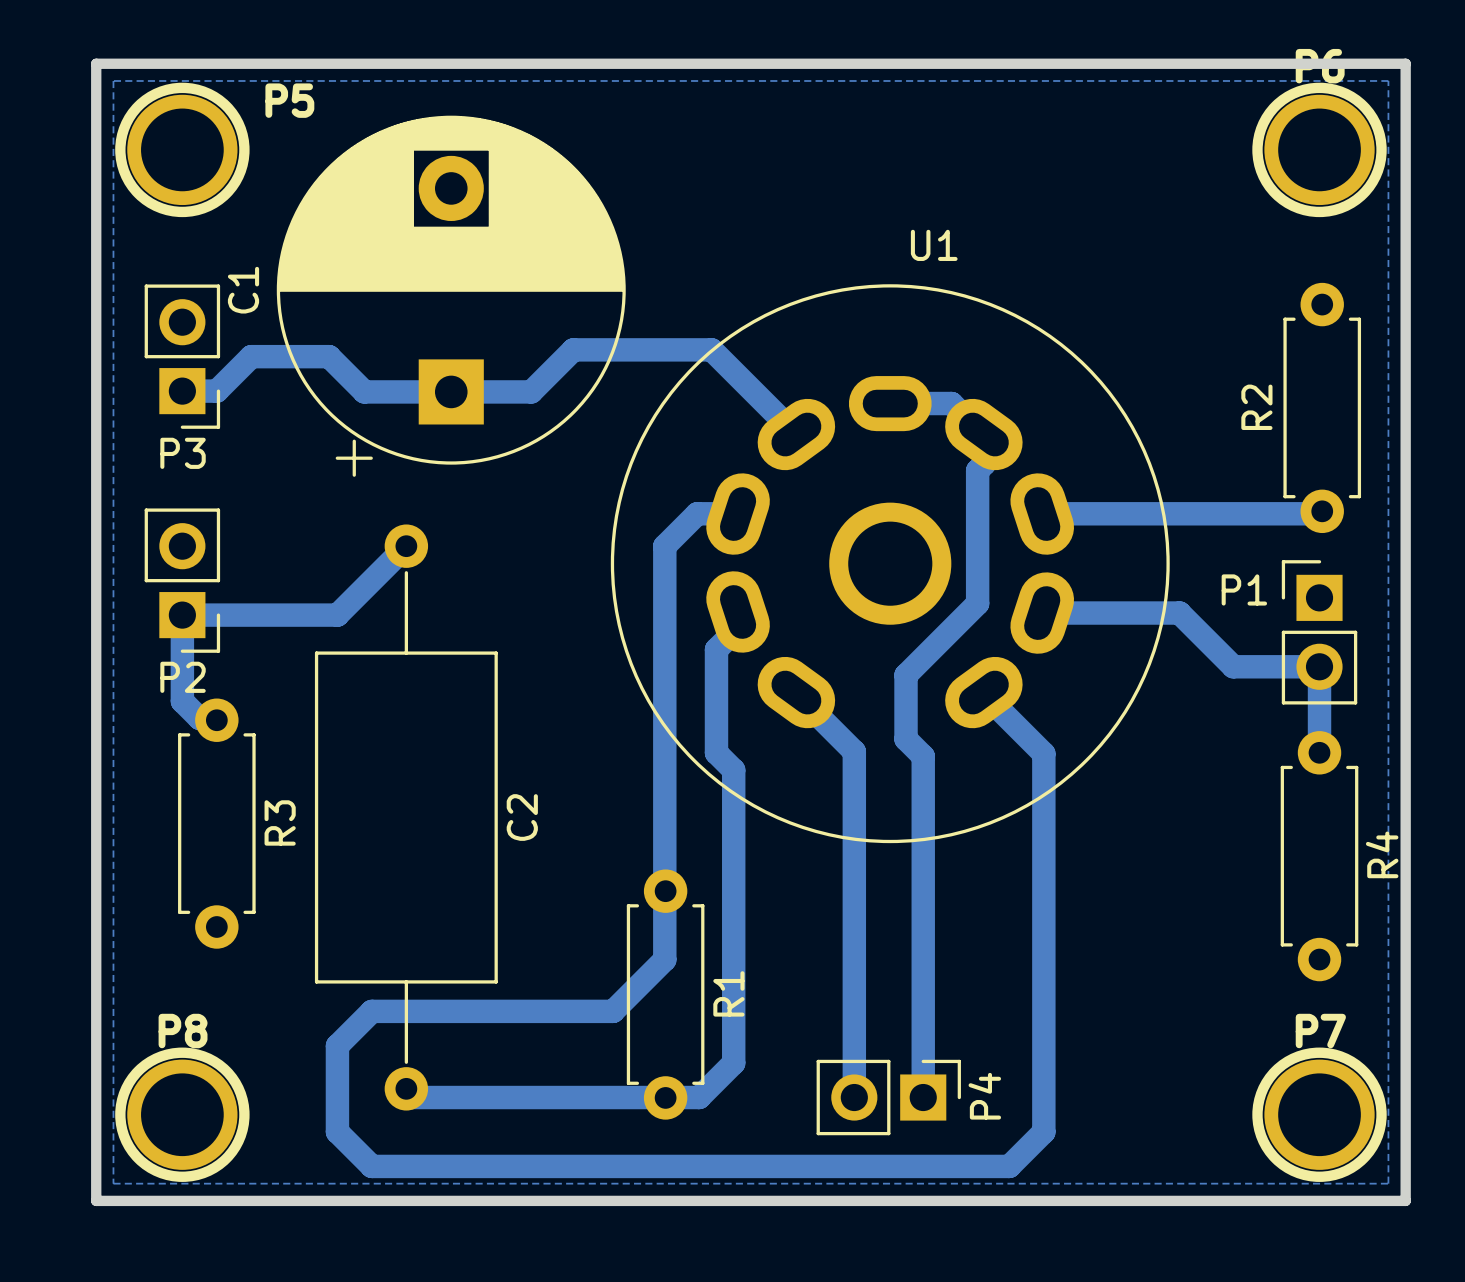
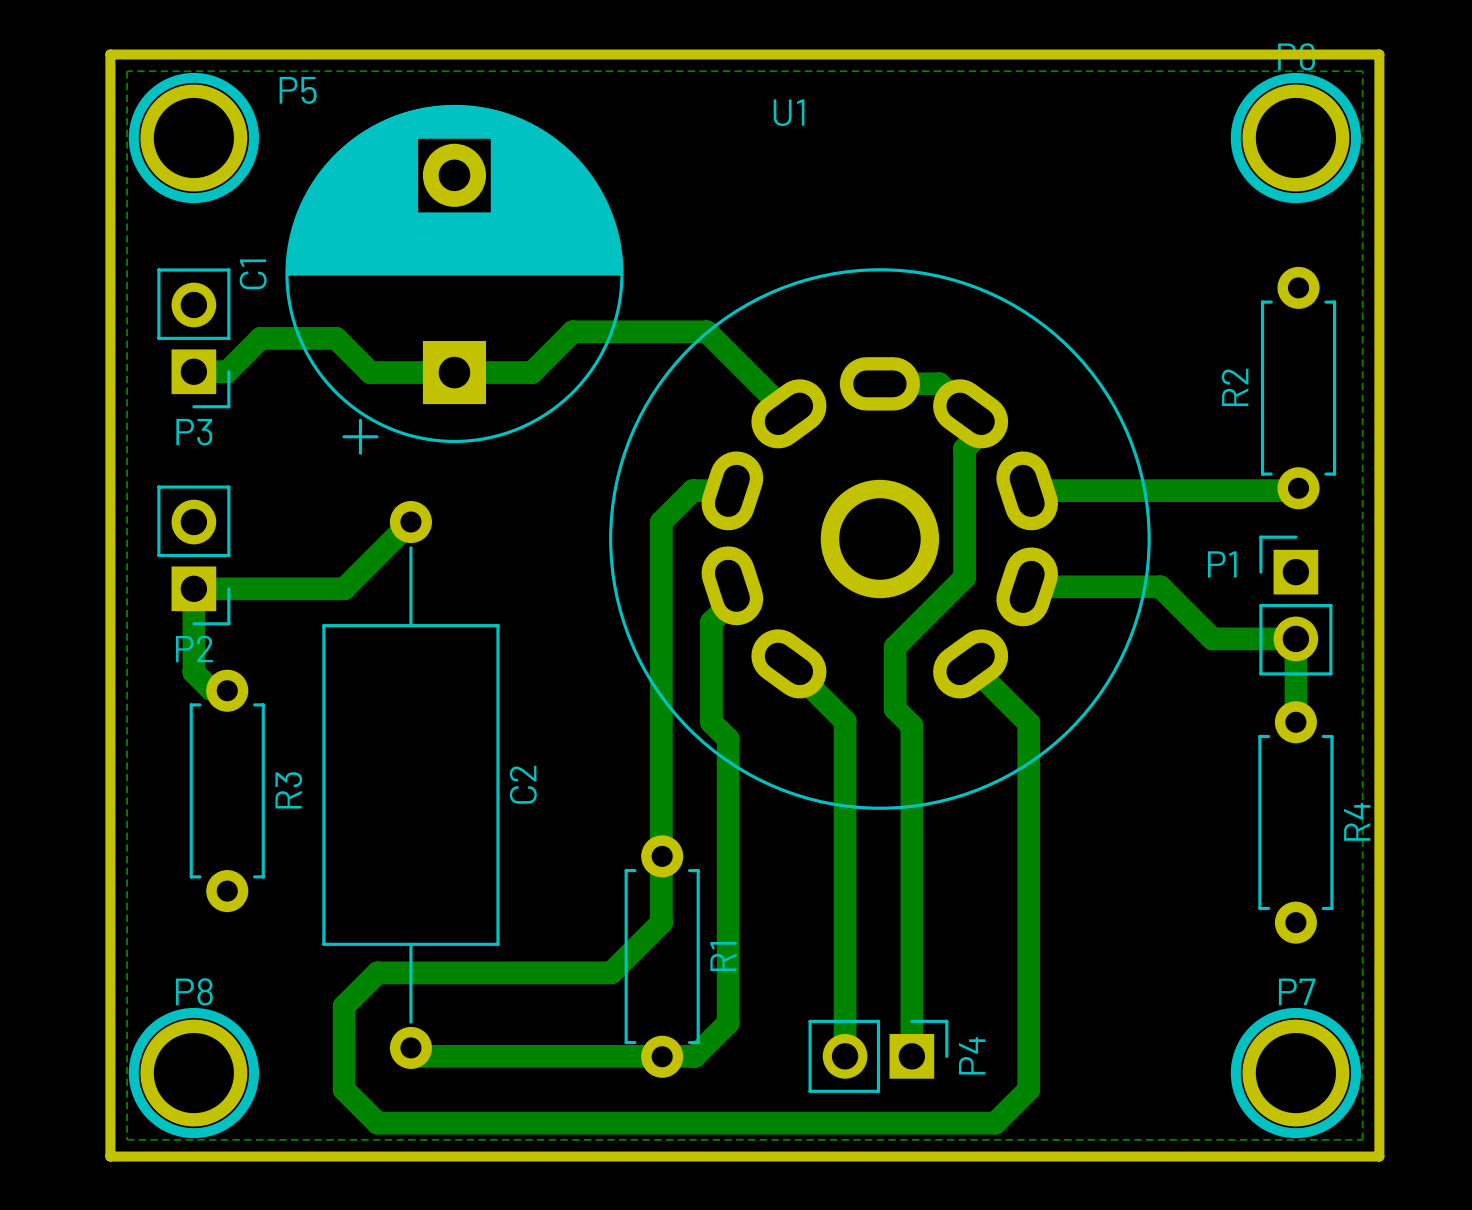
U1 name position: U1 (934, 245) -> U1 (789, 112)

